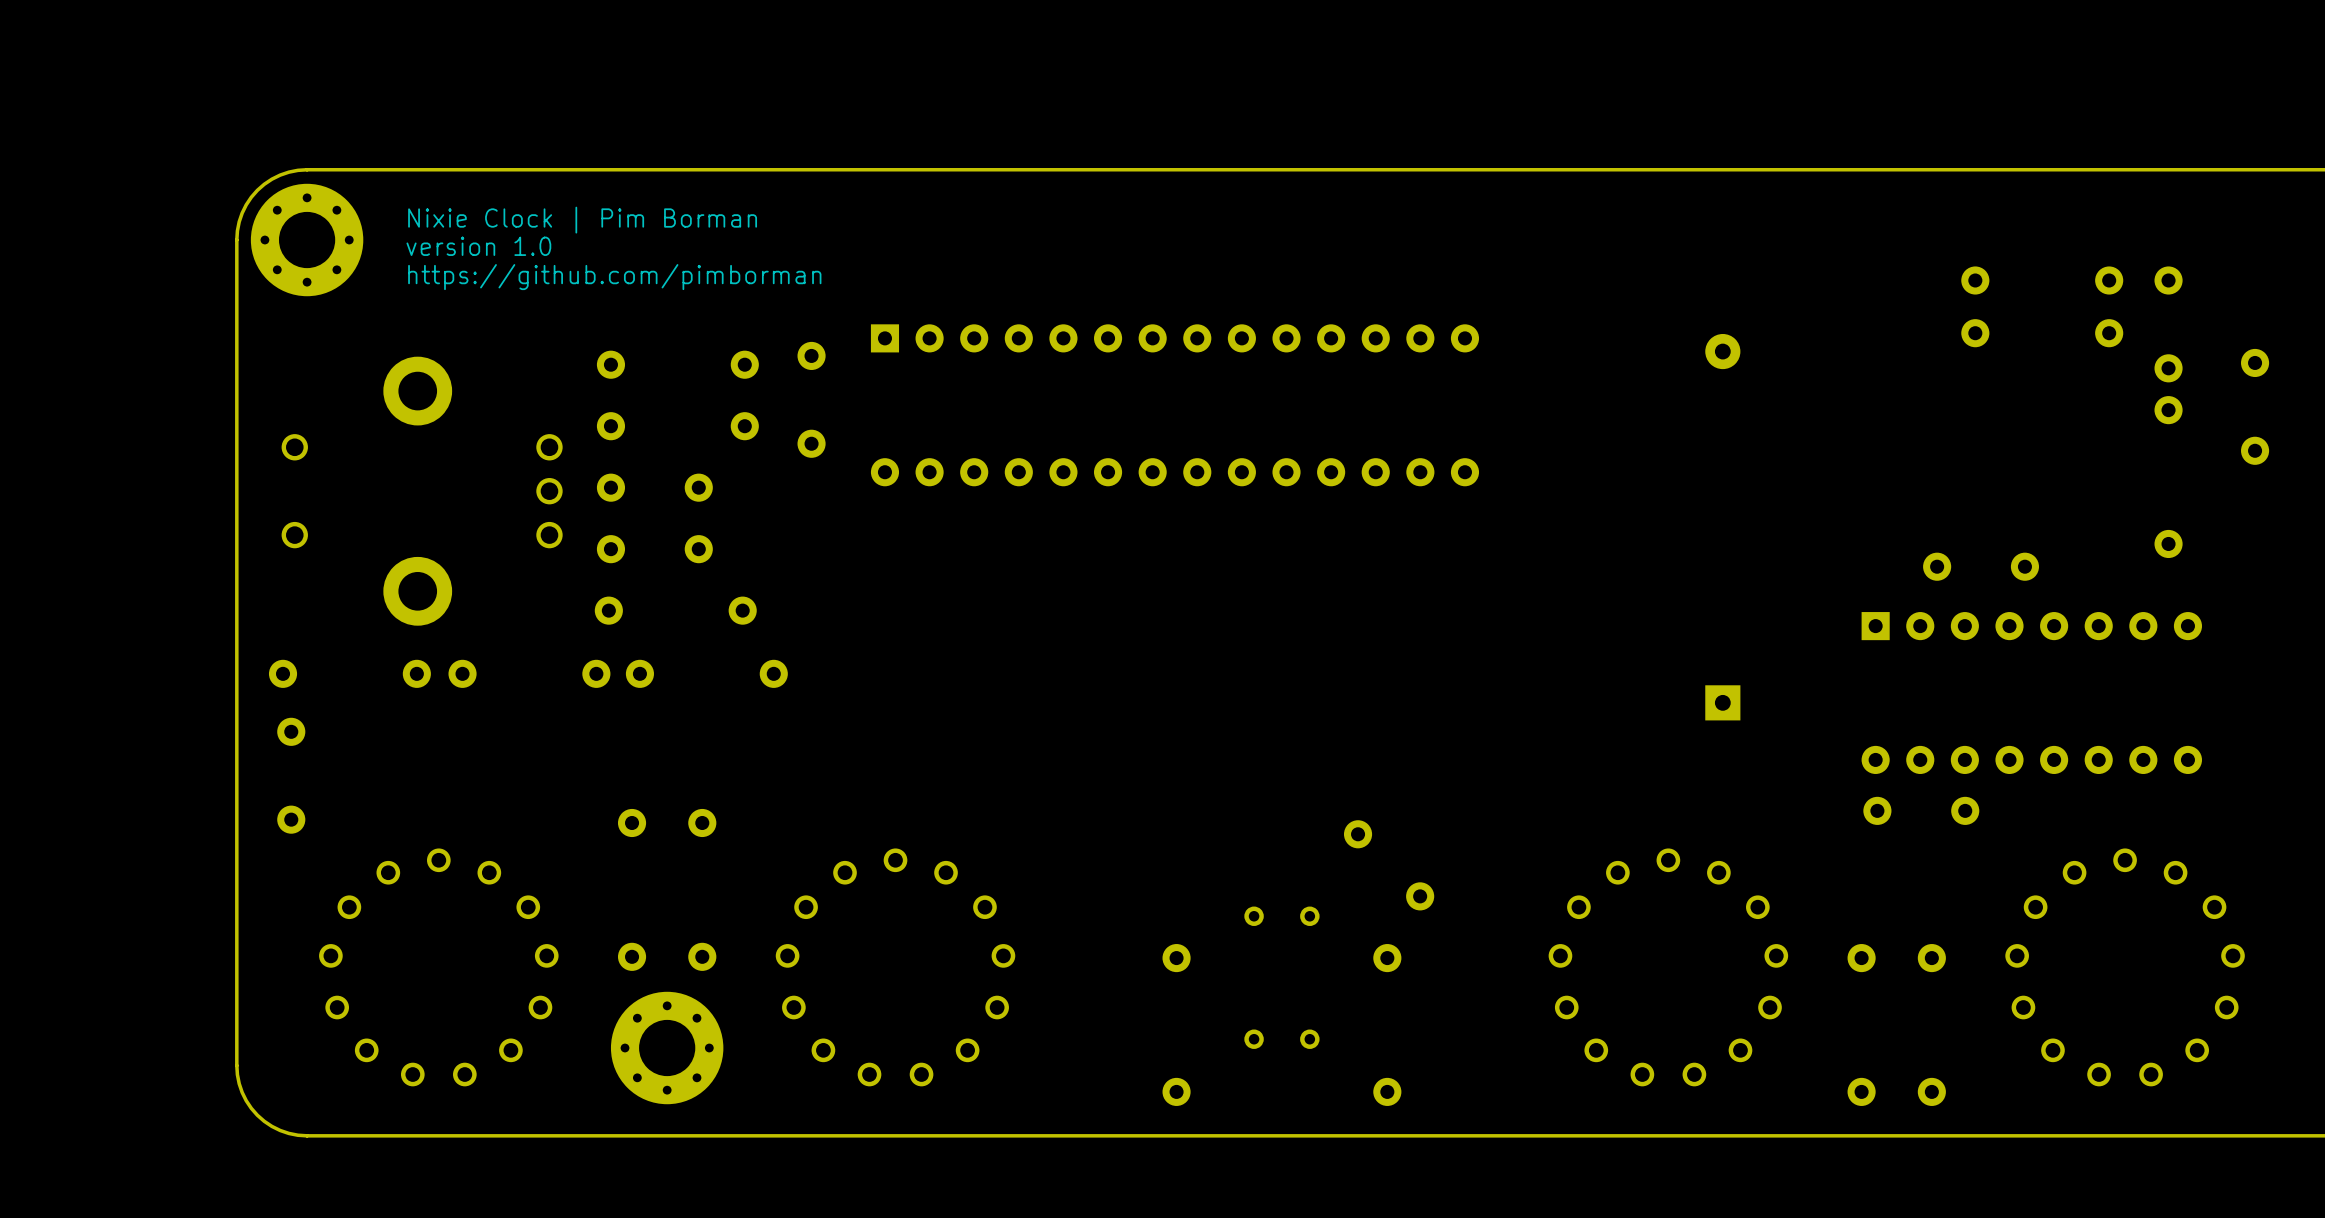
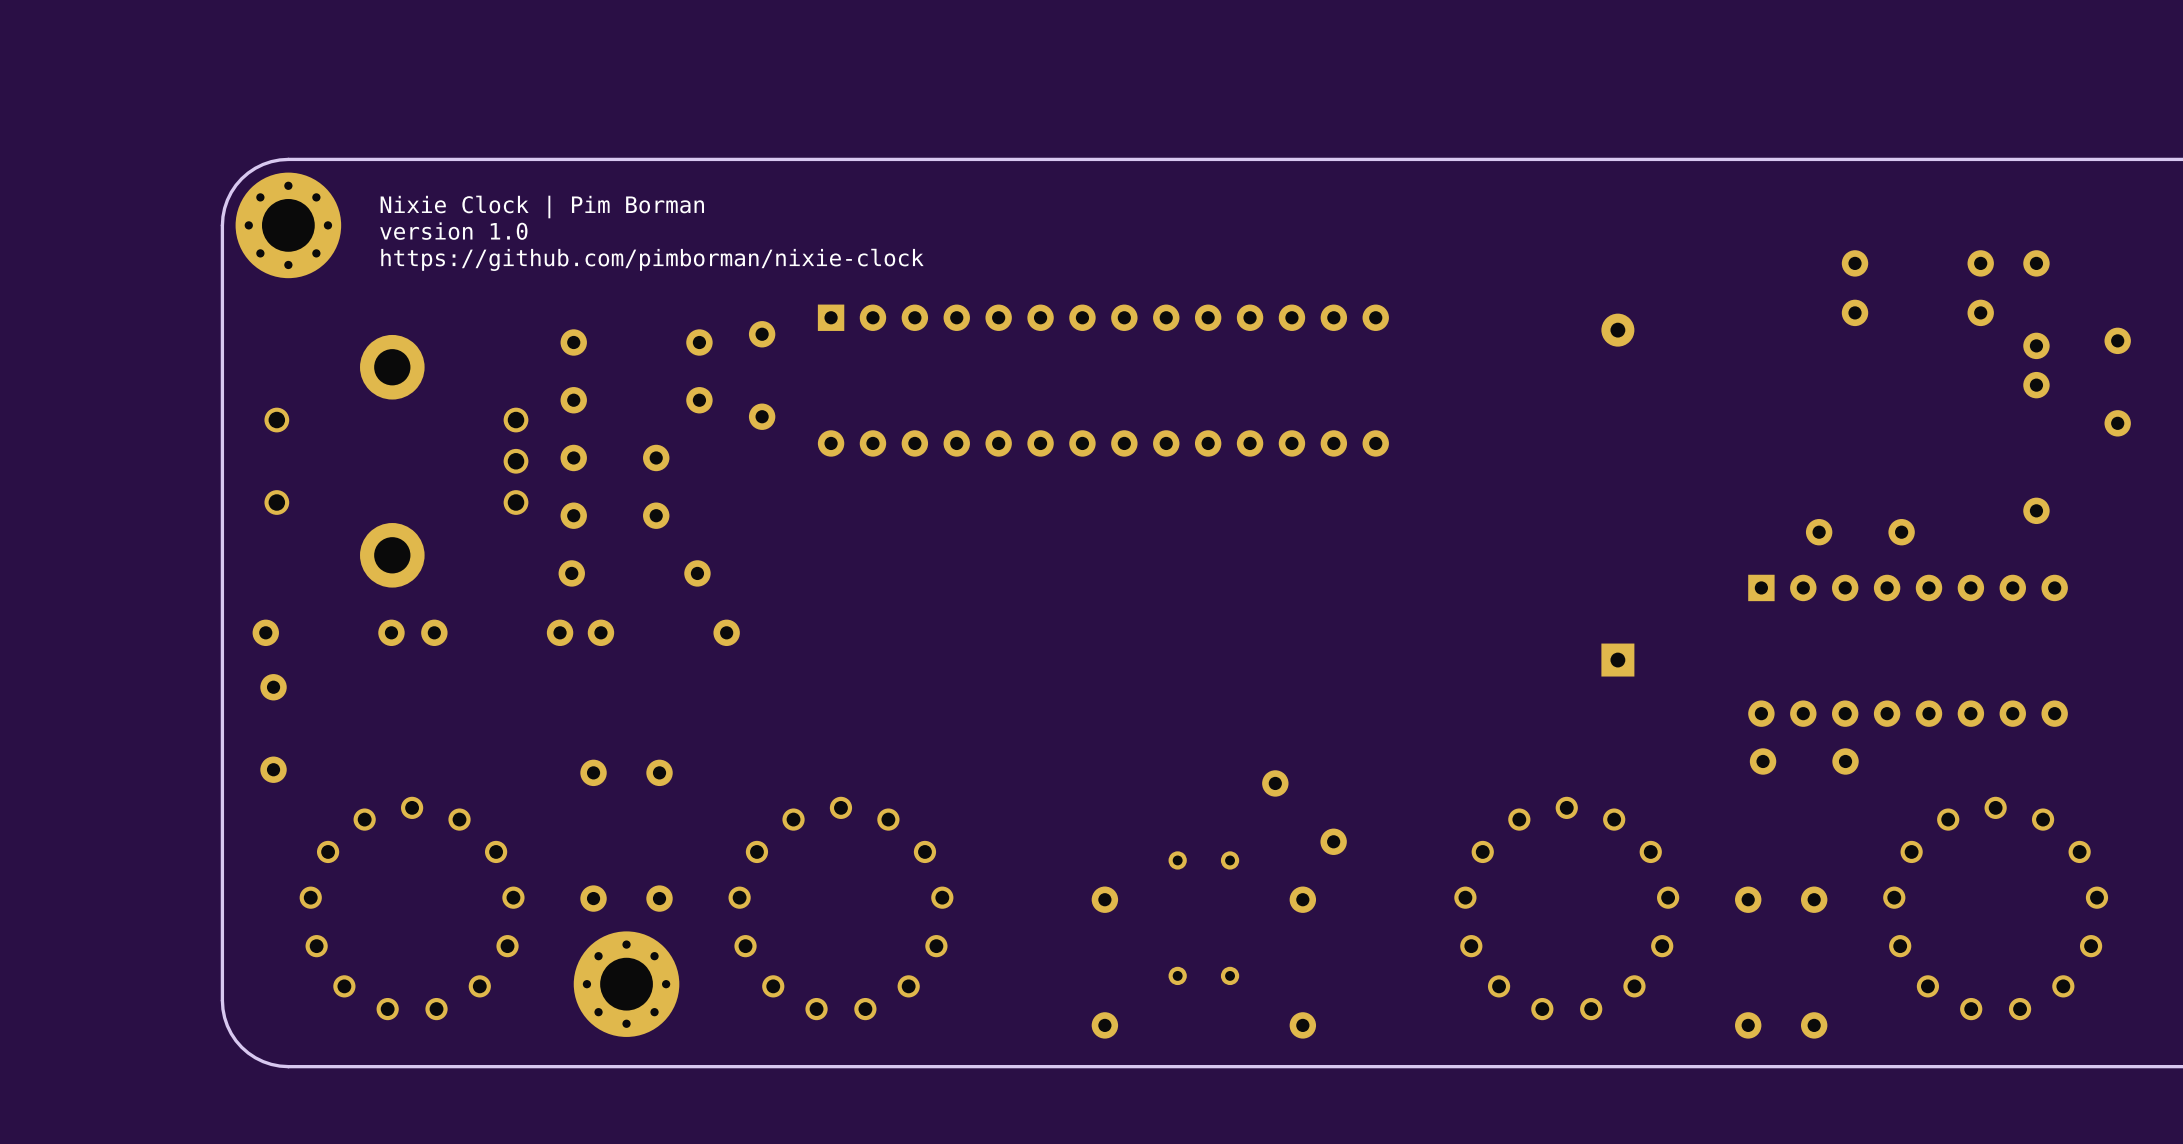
text: https://github.com/pimborman (614, 277) -> https://github.com/pimborman/nixie-clock (652, 259)

